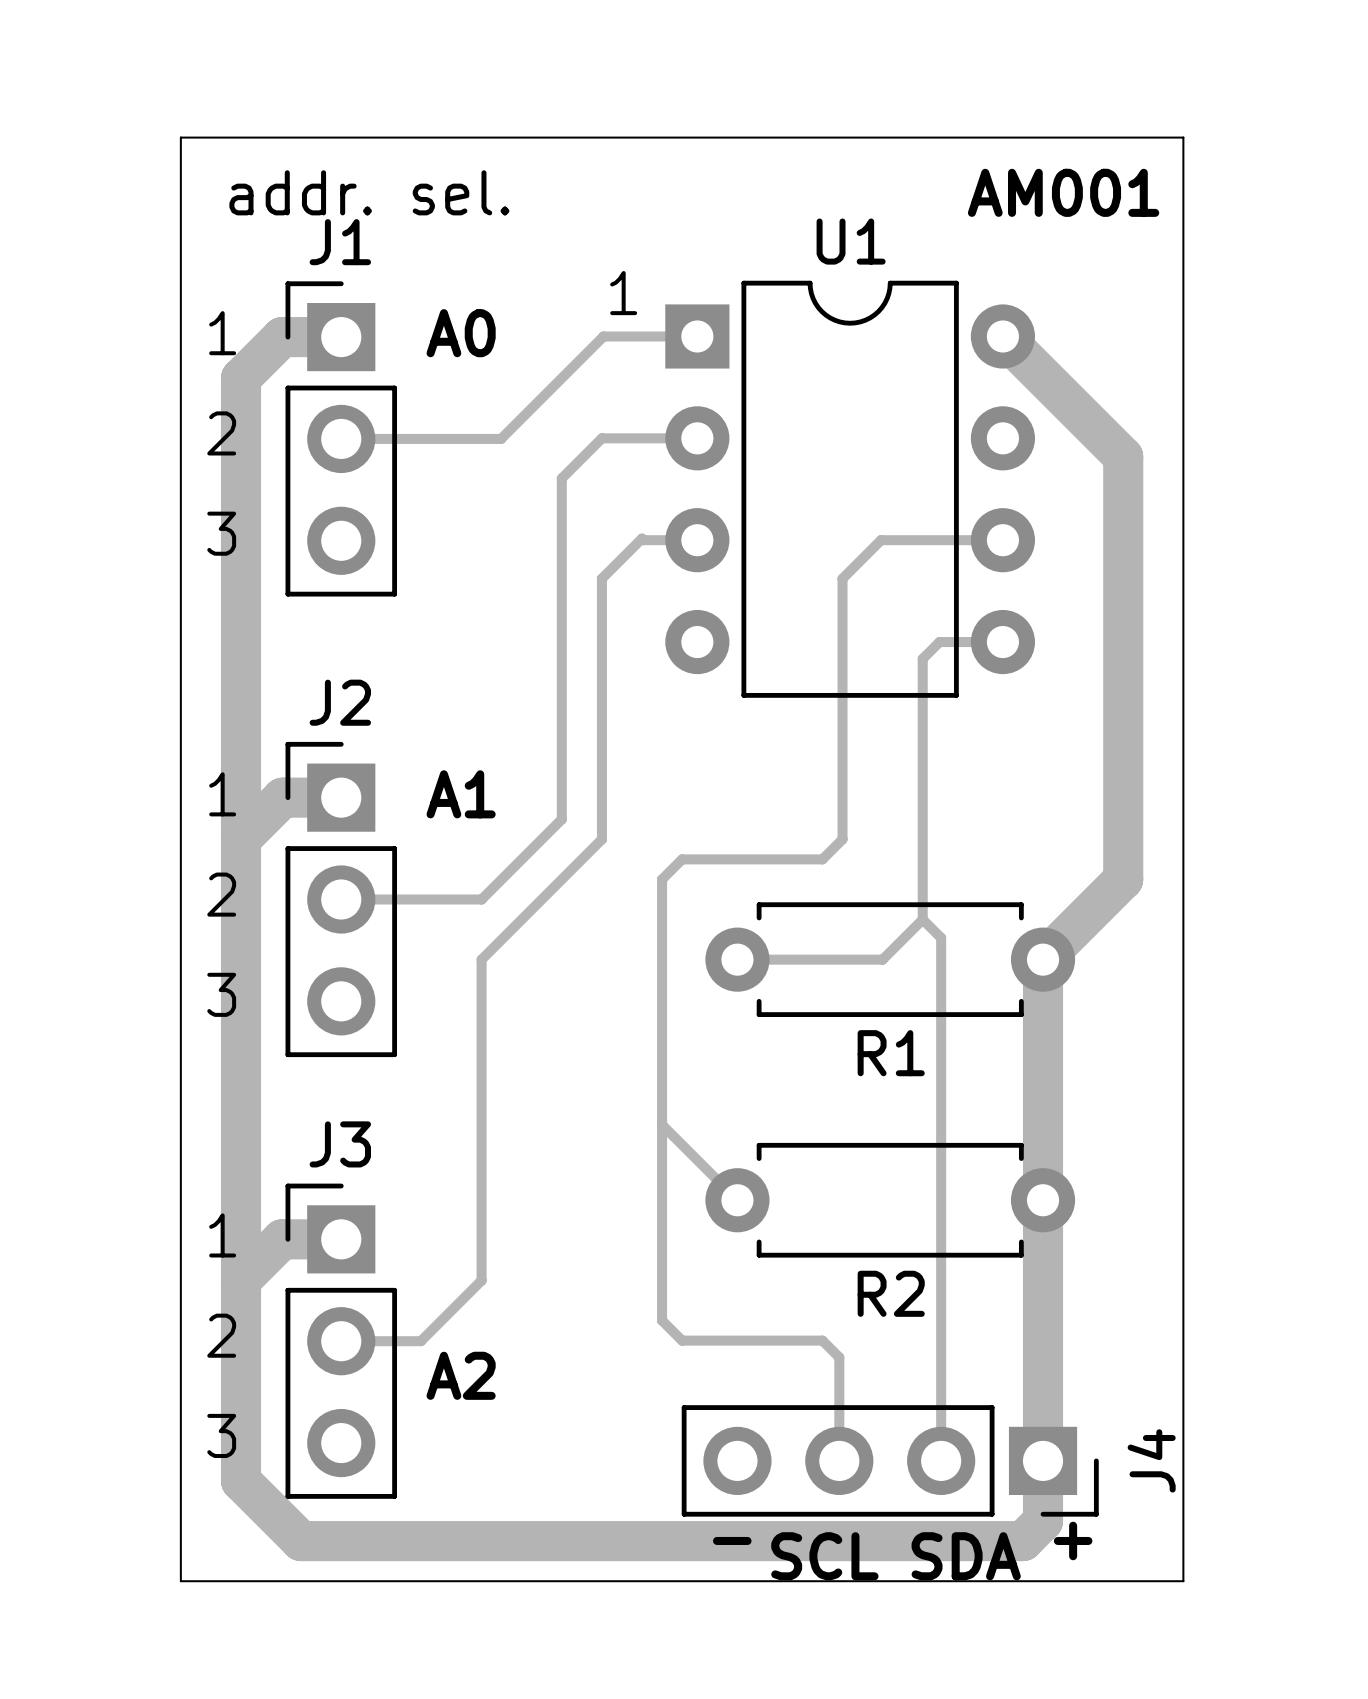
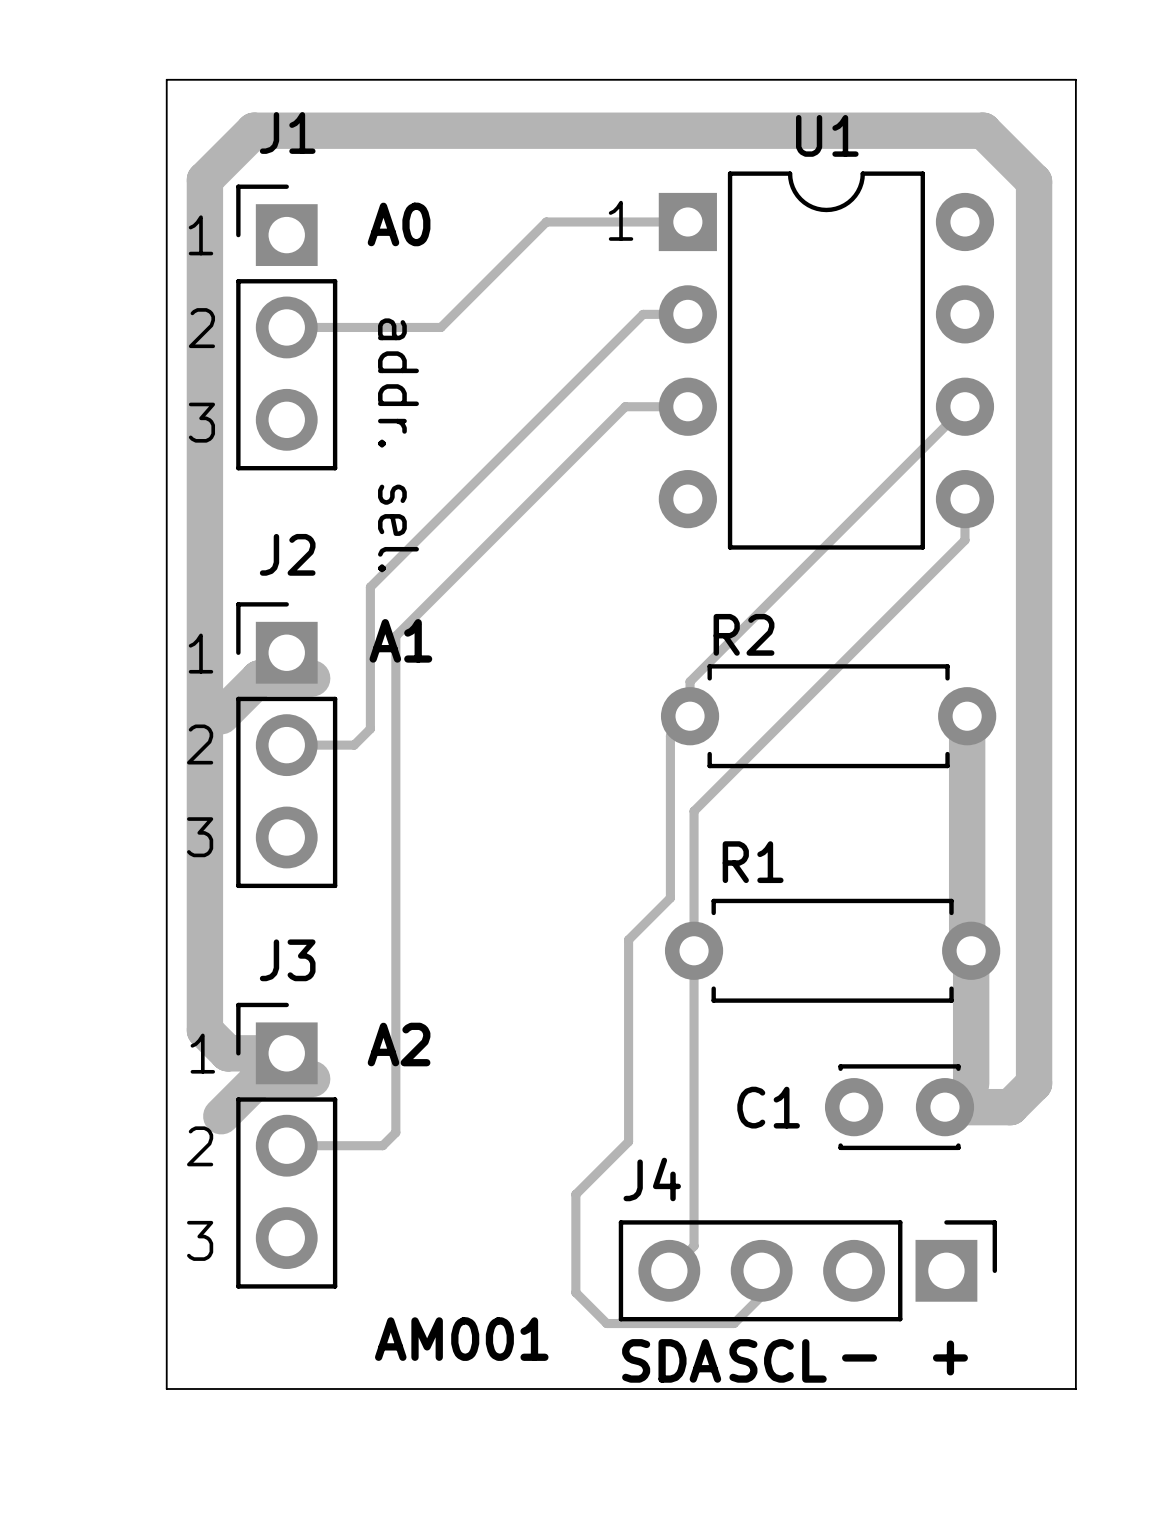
text rotation: 0° (369, 192) -> 90° clockwise (398, 445)
text position: addr. sel. (369, 192) -> addr. sel. (398, 445)
text: AM001 (1063, 192) -> none
J1 name position: J1 (340, 242) -> J1 (287, 132)
text position: 1 (623, 293) -> 1 (621, 220)
track: none -> (687, 221) (546, 221) (440, 327) (286, 327)
text position: 1 (222, 333) -> 1 (200, 235)
text position: A0 (461, 333) -> A0 (399, 224)
track: (697, 336) (603, 336) (501, 438) (341, 438) -> none
track: (1002, 336) (1123, 456) (1123, 879) (1043, 959) (1043, 1521) (1022, 1541) (301, 1541) (241, 1480) (241, 378) (282, 337) (341, 337) -> none
track: none -> (687, 314) (643, 314) (370, 587) (370, 728) (354, 745) (286, 745)
text position: 2 (221, 433) -> 2 (201, 328)
J1 position: (341, 438) -> (286, 327)
track: (697, 438) (601, 438) (561, 478) (561, 819) (481, 899) (341, 899) -> none
U1 position: (850, 489) -> (826, 360)
track: none -> (687, 406) (625, 406) (395, 636) (395, 1132) (382, 1145) (286, 1145)
track: none -> (964, 406) (690, 681) (690, 716) (670, 735) (670, 898) (628, 939) (628, 1141) (575, 1194) (575, 1292) (606, 1323) (734, 1323) (761, 1295) (761, 1270)
text position: 3 (221, 533) -> 3 (201, 422)
track: (697, 540) (643, 540) (642, 538) (601, 578) (601, 839) (481, 959) (481, 1280) (420, 1341) (341, 1341) -> none
track: (1002, 540) (881, 540) (842, 578) (842, 839) (822, 859) (682, 859) (662, 879) (662, 1320) (682, 1340) (822, 1340) (839, 1357) (839, 1460) -> none
track: none -> (964, 499) (964, 540) (694, 811) (694, 1246) (669, 1270)
track: (1002, 642) (939, 642) (922, 658) (922, 919) -> none
J2 name position: J2 (340, 702) -> J2 (287, 554)
text position: 1 (222, 794) -> 1 (200, 653)
text position: A1 (461, 794) -> A1 (400, 640)
track: none -> (967, 716) (967, 946) (971, 950) (971, 1083) (946, 1108)
text position: 2 (221, 894) -> 2 (200, 744)
J2 position: (341, 899) -> (286, 745)
track: (922, 919) (941, 937) (941, 1460) -> none
track: (922, 919) (882, 959) (737, 959) -> none
R1 position: (890, 959) -> (832, 950)
text position: 3 (221, 994) -> 3 (200, 837)
R1 name position: R1 (891, 1053) -> R1 (753, 862)
track: (662, 1124) (737, 1200) -> none
J3 name position: J3 (340, 1144) -> J3 (287, 960)
R2 position: (890, 1200) -> (828, 716)
track: none -> (286, 1053) (227, 1053) (204, 1030) (204, 179) (254, 130) (983, 130) (1034, 181) (1034, 1083) (1010, 1107) (947, 1107)
text position: 1 (222, 1235) -> 1 (202, 1053)
C1: none -> (899, 1107)
R2 name position: R2 (891, 1293) -> R2 (744, 634)
text position: 2 (221, 1335) -> 2 (200, 1146)
J3 position: (341, 1341) -> (286, 1145)
text position: A2 (461, 1375) -> A2 (399, 1044)
J4 footprint: [681, 1405, 1099, 1517] -> [618, 1220, 997, 1322]
text position: 3 (221, 1435) -> 3 (200, 1240)
J4 name position: J4 (1151, 1460) -> J4 (652, 1179)
text: none -> AM001 (461, 1339)
text position: - (732, 1540) -> - (859, 1357)
text position: + (1073, 1540) -> + (950, 1357)
text position: SCL (824, 1556) -> SCL (778, 1360)
text position: SDA (966, 1556) -> SDA (671, 1360)

